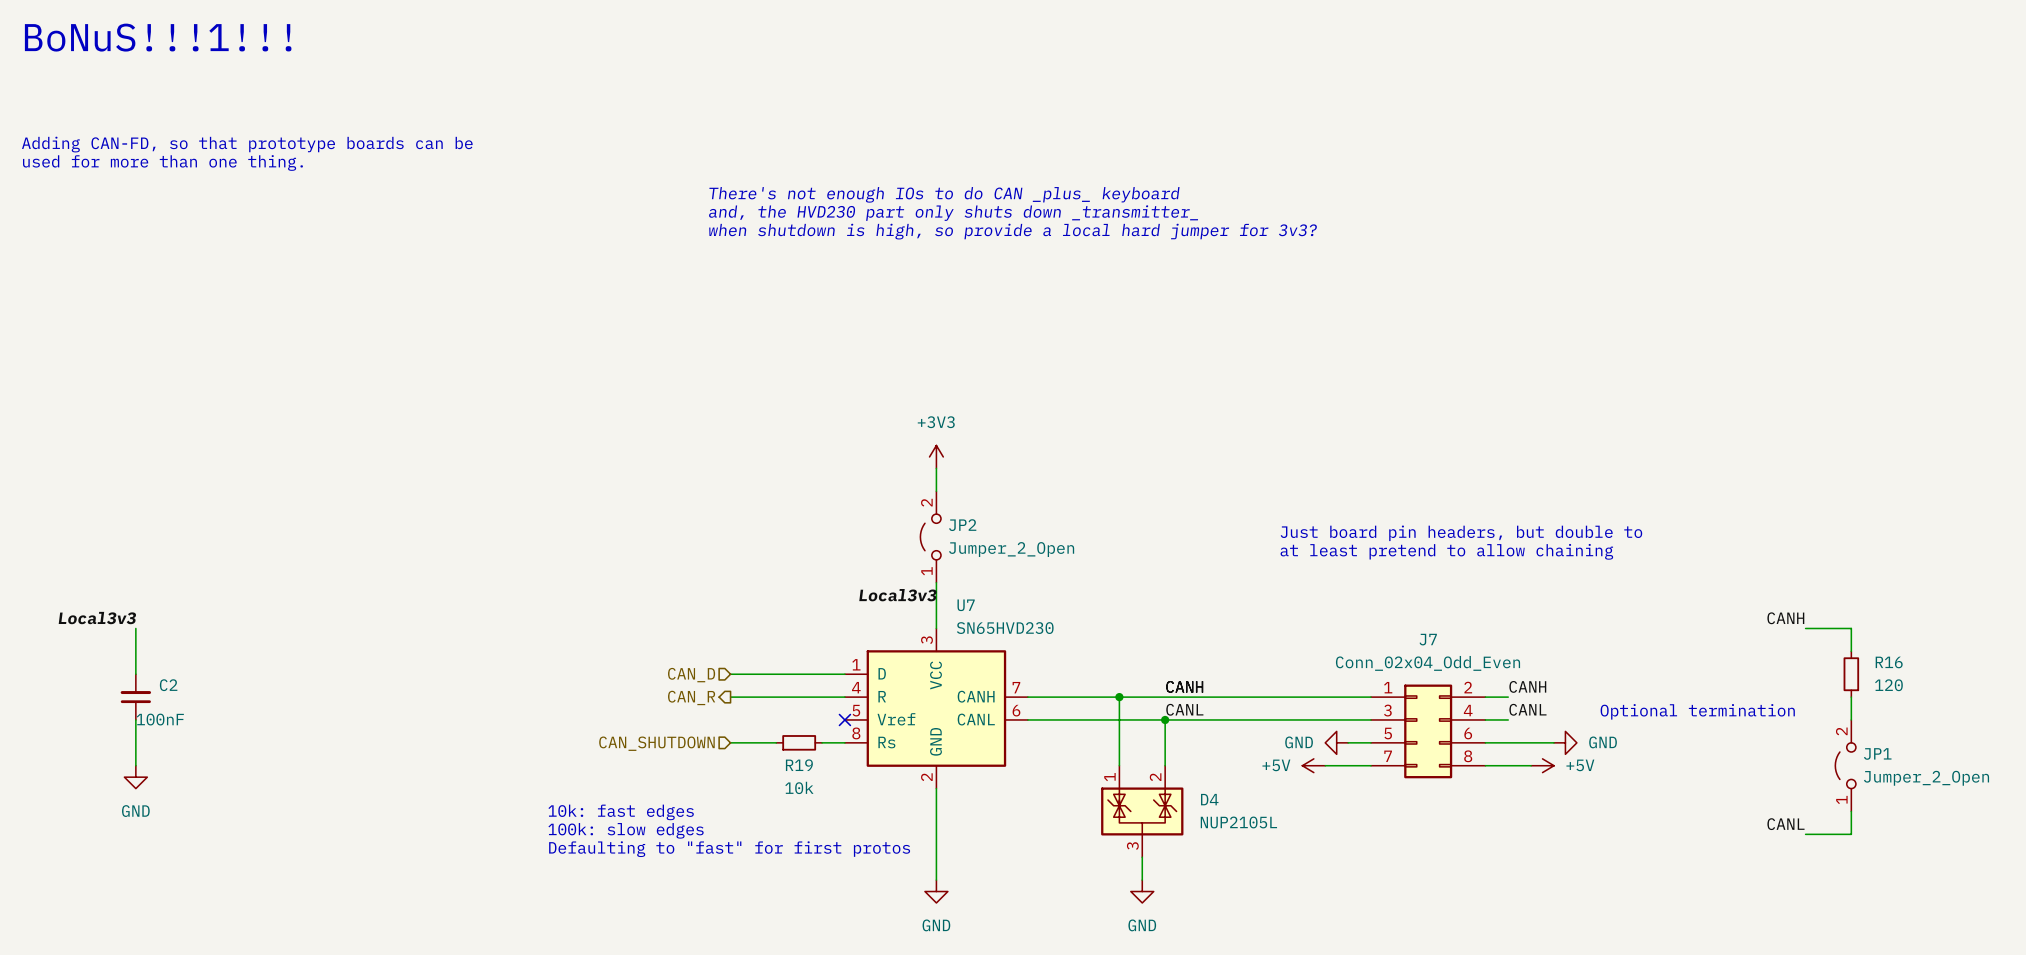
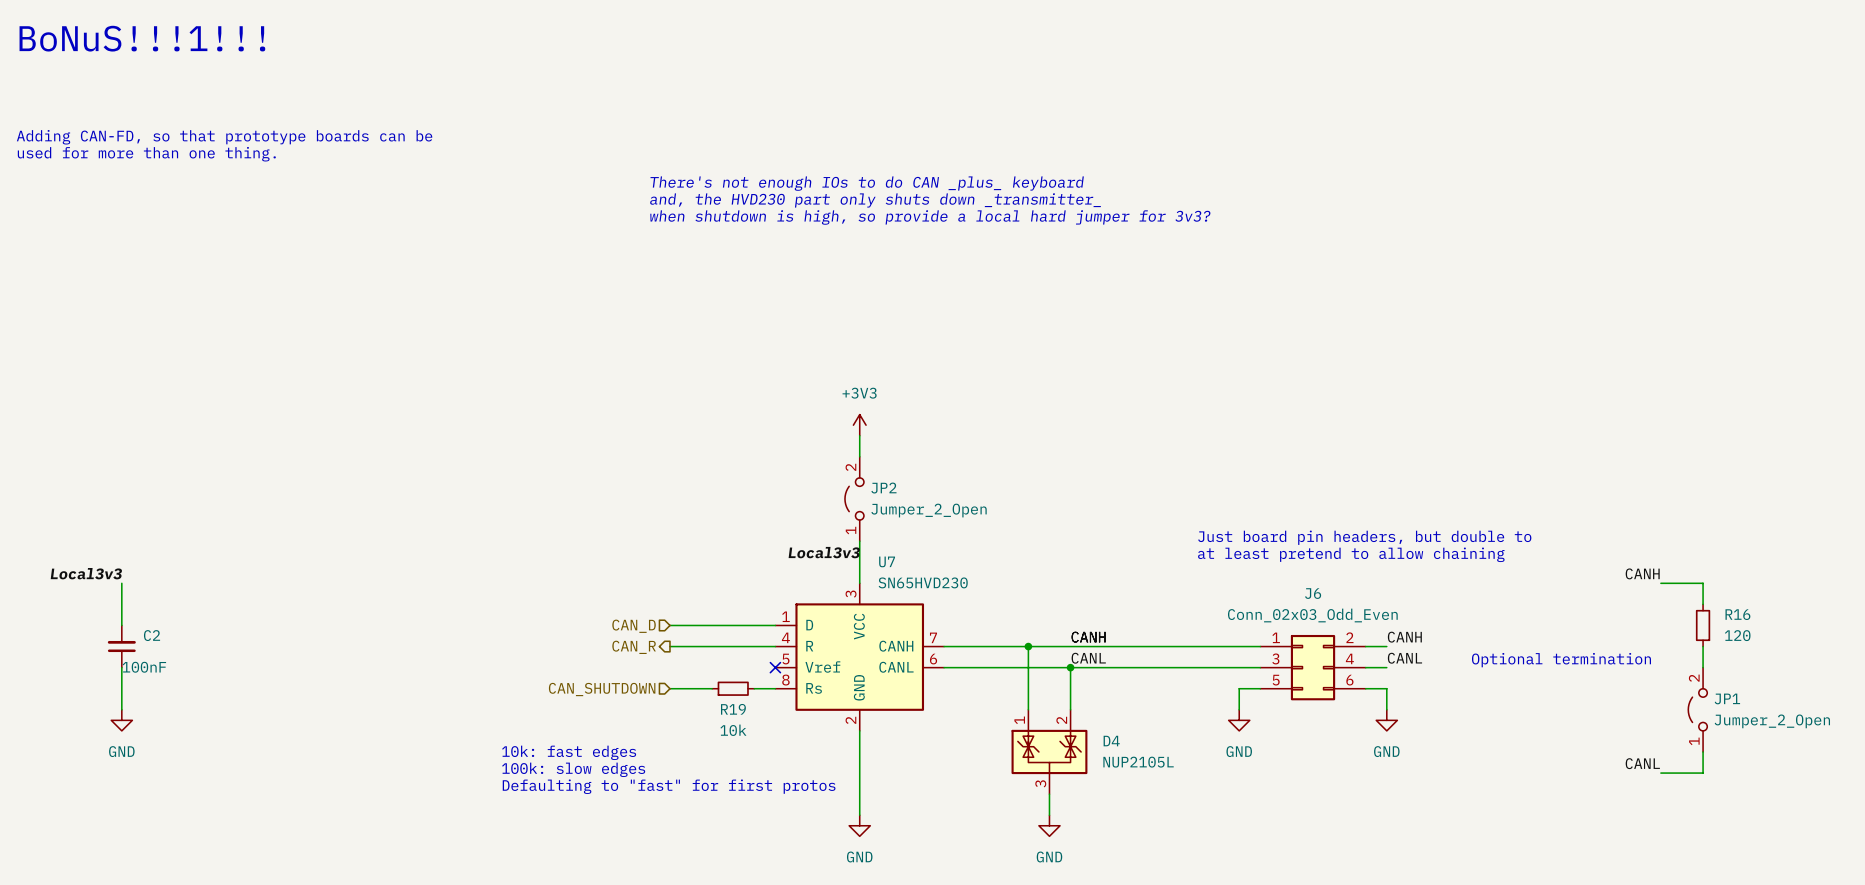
text position: Just board pin headers, but double to (1461, 533) -> Just board pin headers, but double to (1364, 537)
text position: at least pretend to allow chaining (1446, 551) -> at least pretend to allow chaining (1351, 554)
J6: none -> Conn_02x03_Odd_Even (1313, 667)
J7: Conn_02x04_Odd_Even (1428, 731) -> none
power symbol rotation: 0° (1336, 742) -> 90° counterclockwise (1239, 720)
power symbol position: GND (1336, 742) -> GND (1239, 720)
wire: none -> (1239, 688) (1239, 709)
wire: (1508, 742) (1553, 742) -> (1386, 688) (1386, 709)
power symbol rotation: 0° (1565, 742) -> 90° clockwise (1386, 720)
power symbol position: GND (1565, 742) -> GND (1386, 720)
power symbol: +5V (1313, 765) -> none
wire: (1325, 765) (1371, 765) -> none
wire: (1485, 765) (1531, 765) -> none
power symbol: +5V (1542, 765) -> none

